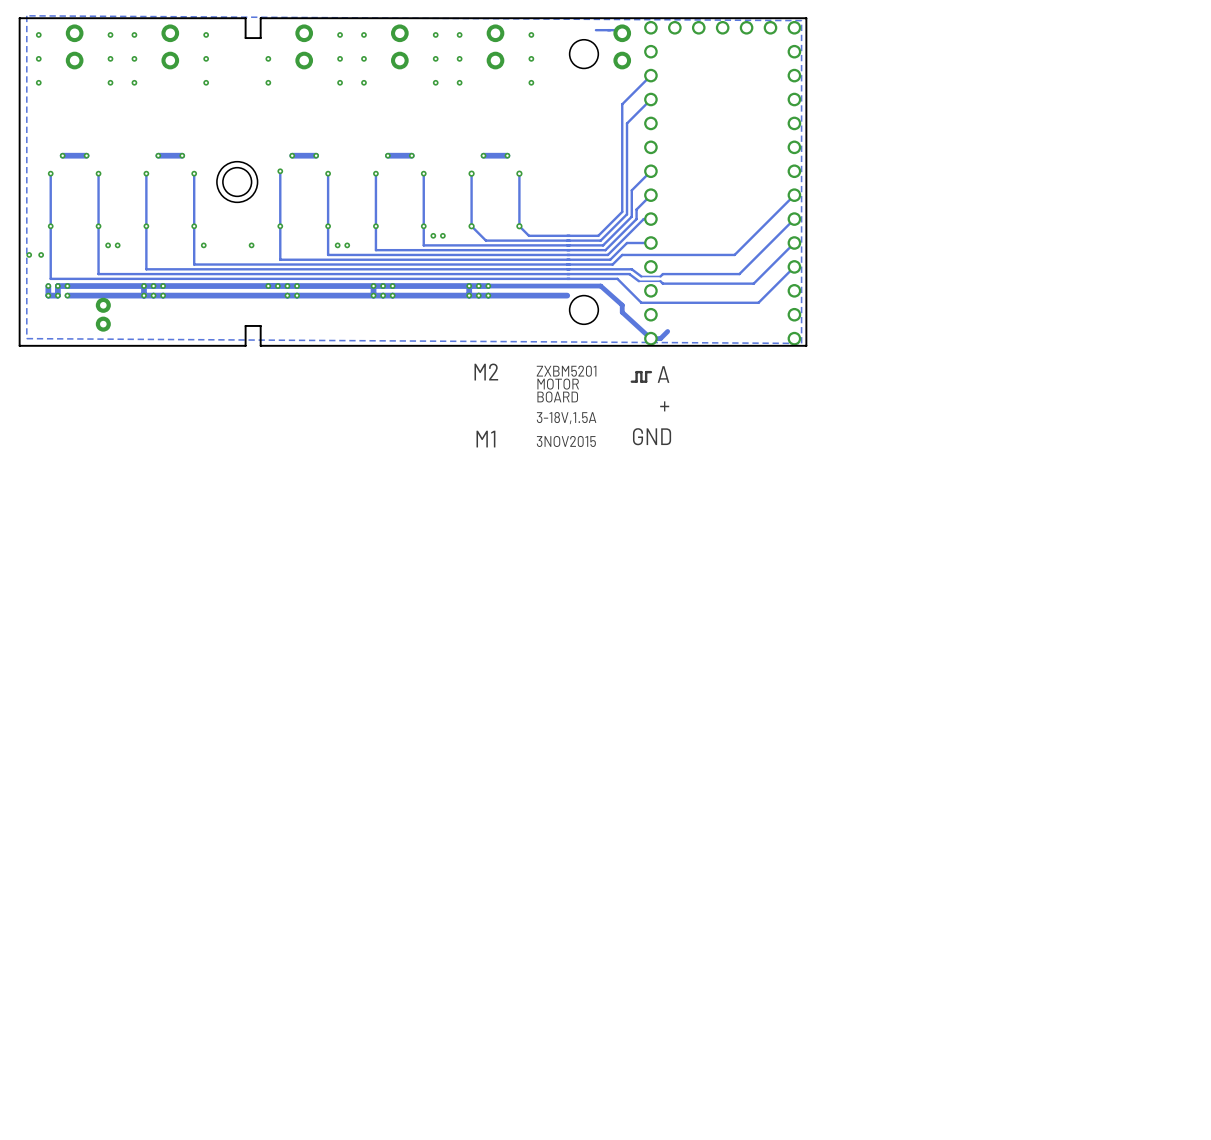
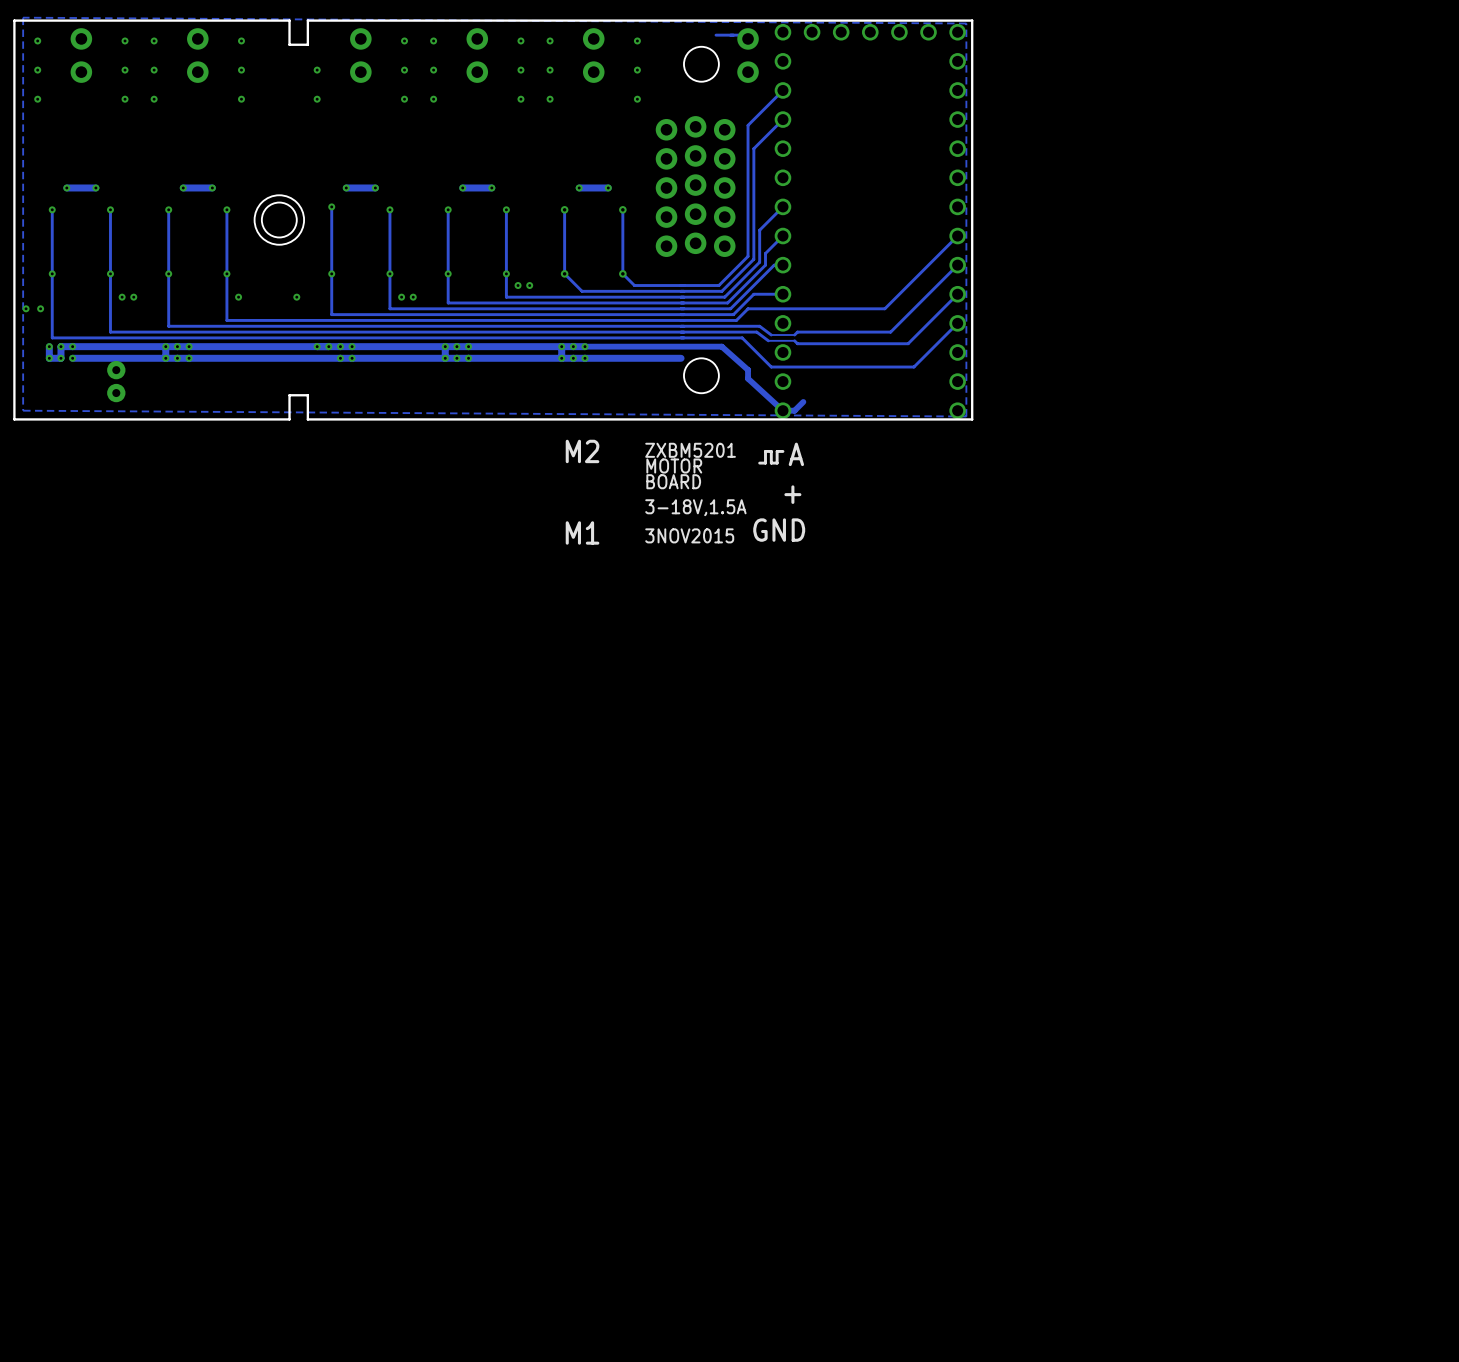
part: none -> (695, 128)
part: none -> (695, 157)
part: none -> (695, 186)
part: none -> (695, 215)
part: none -> (695, 244)

